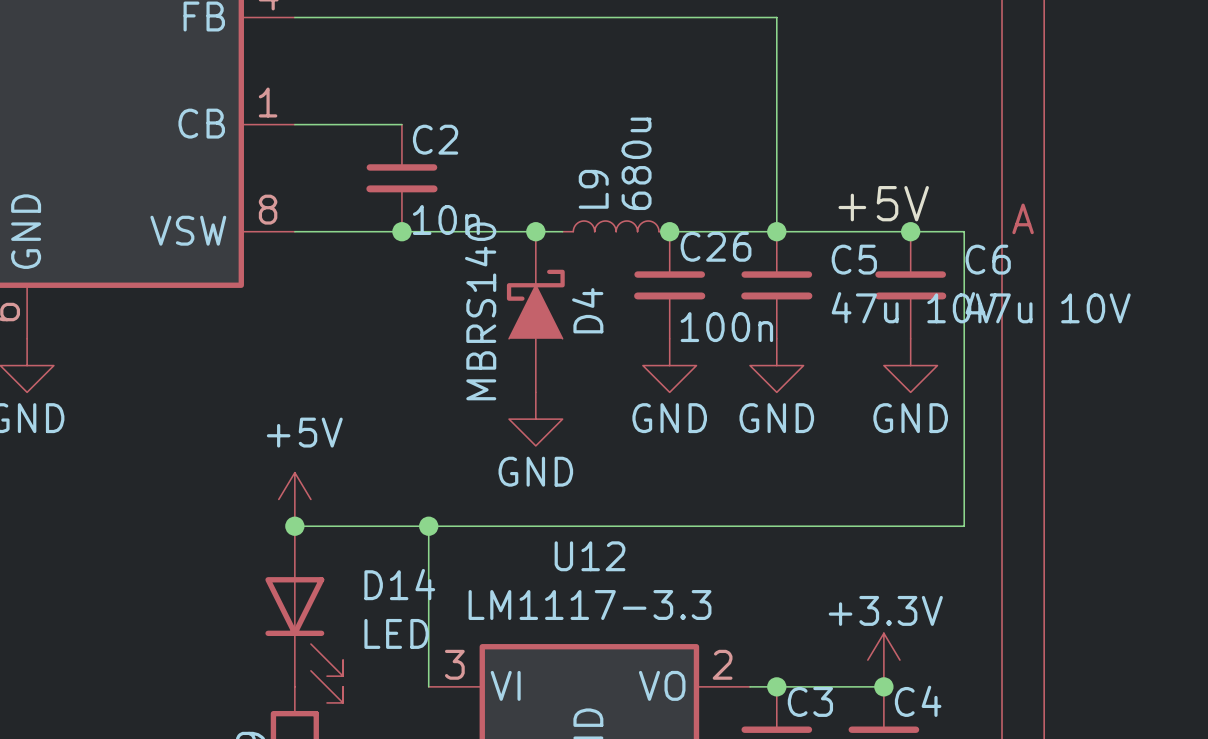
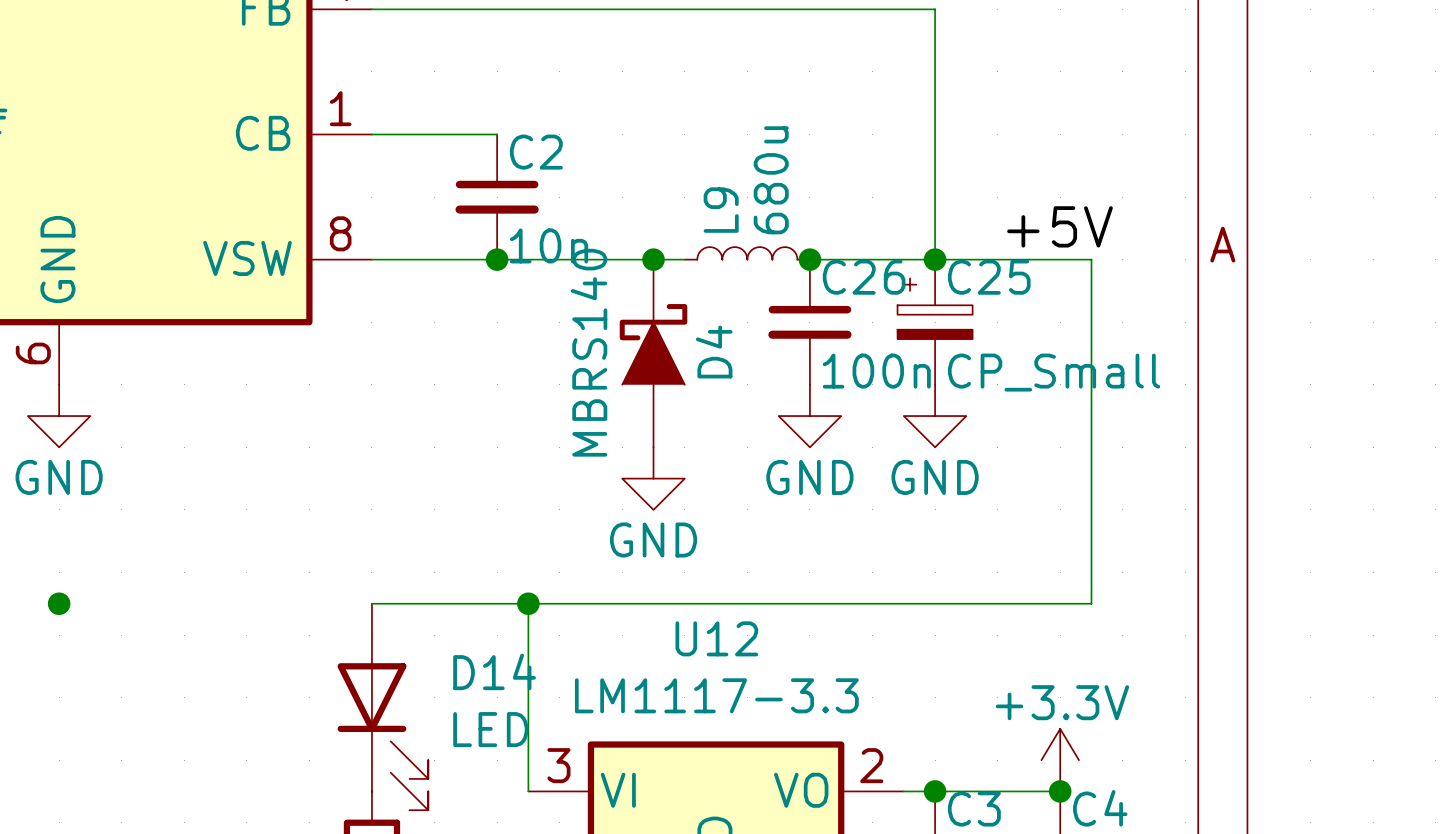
wire: (910, 231) (964, 231) (964, 526) (910, 526) -> (1091, 259) (1091, 603)
junction: (910, 231) -> none
C5: 47u 10V (776, 285) -> none
C25: none -> CP_Small (935, 322)
C6: 47u 10V (910, 285) -> none
power symbol: GND (910, 365) -> none
power symbol: +5V (294, 499) -> none
junction: none -> (59, 603)
junction: (294, 526) -> none

